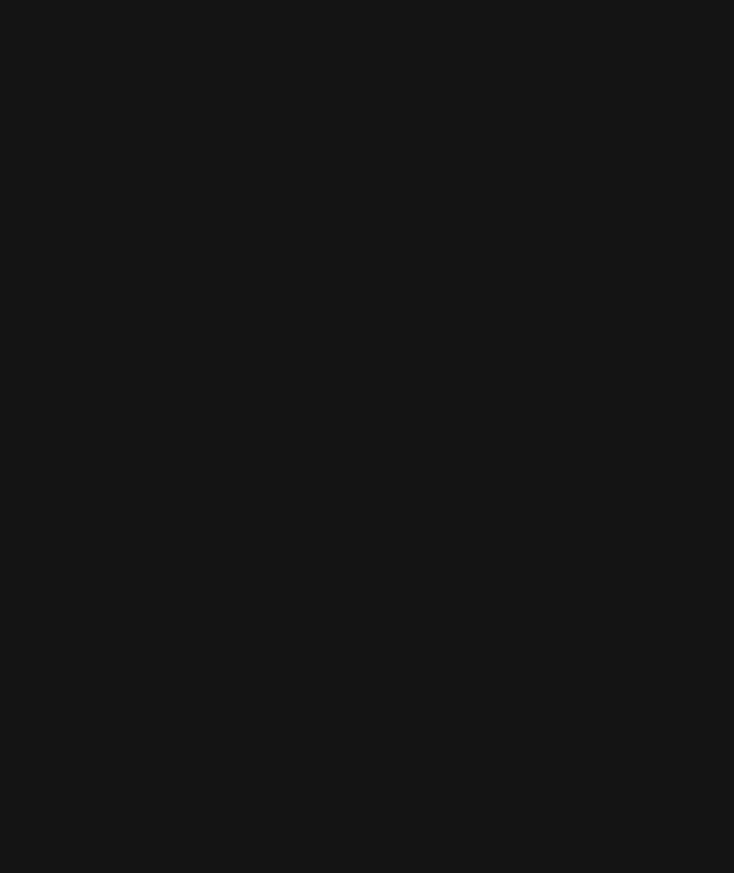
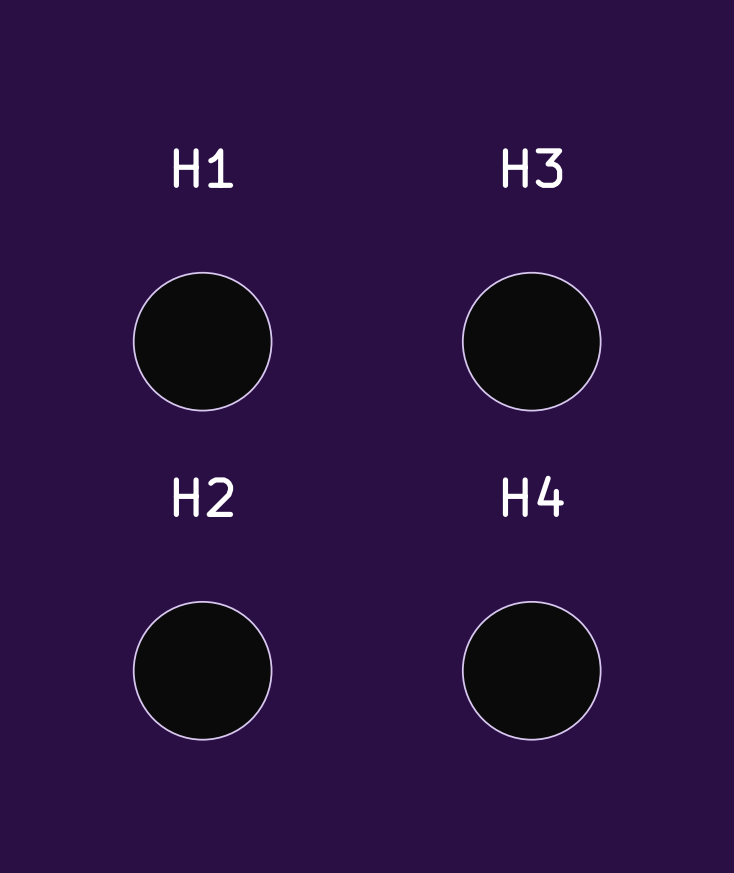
H1: none -> (202, 341)
H3: none -> (531, 341)
H2: none -> (202, 670)
H4: none -> (531, 670)

